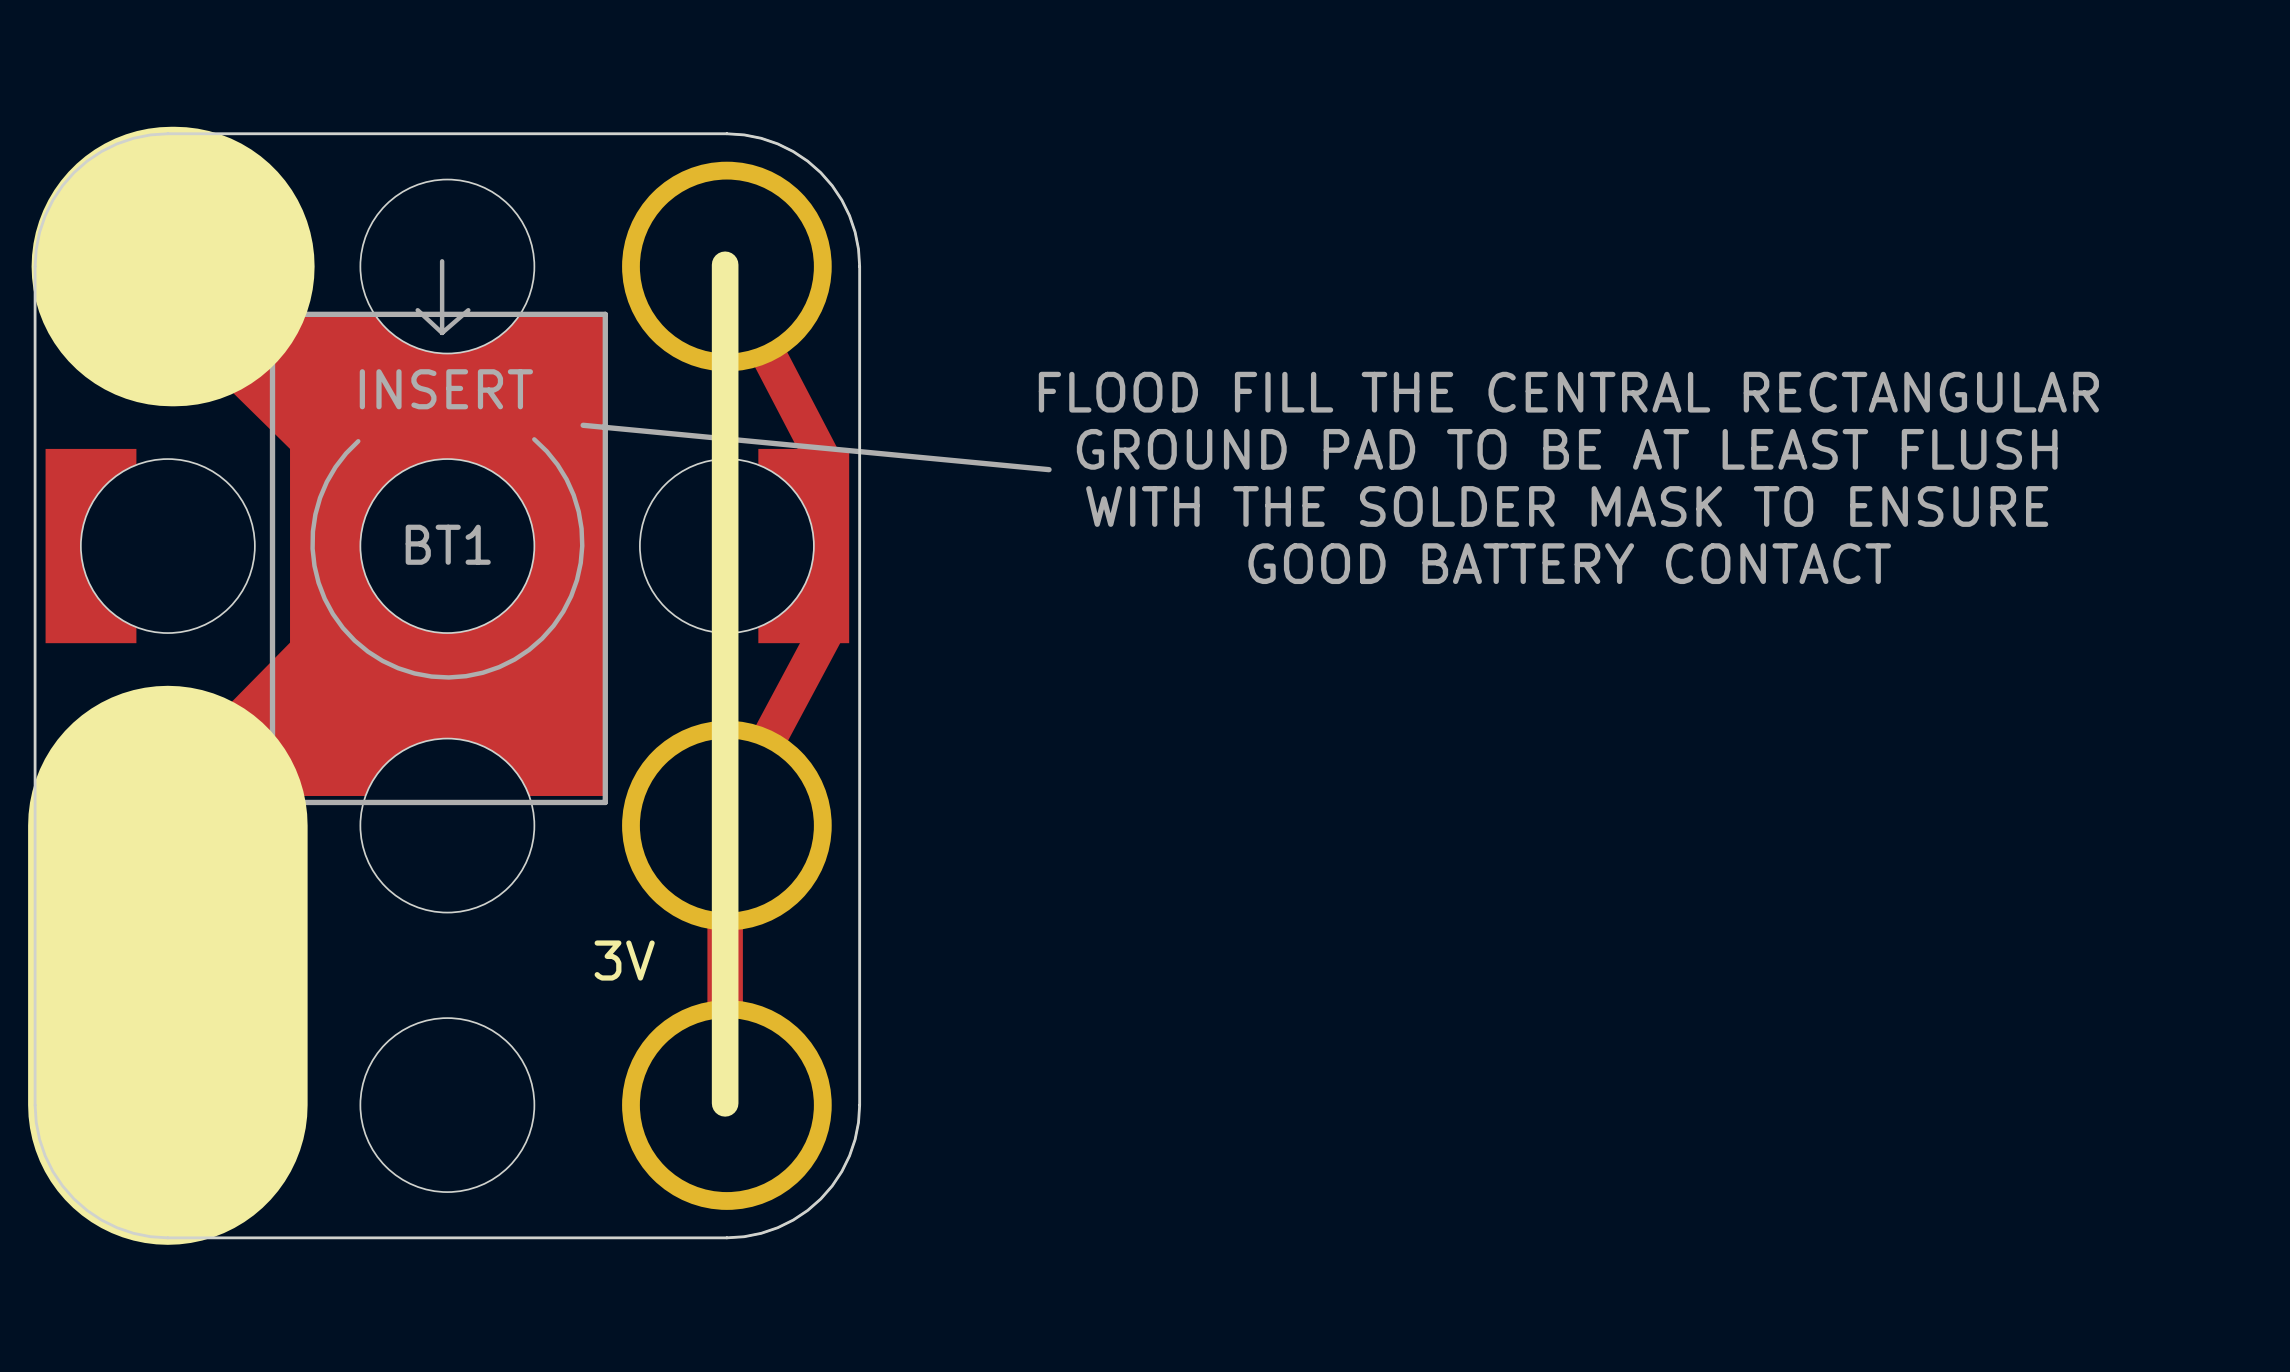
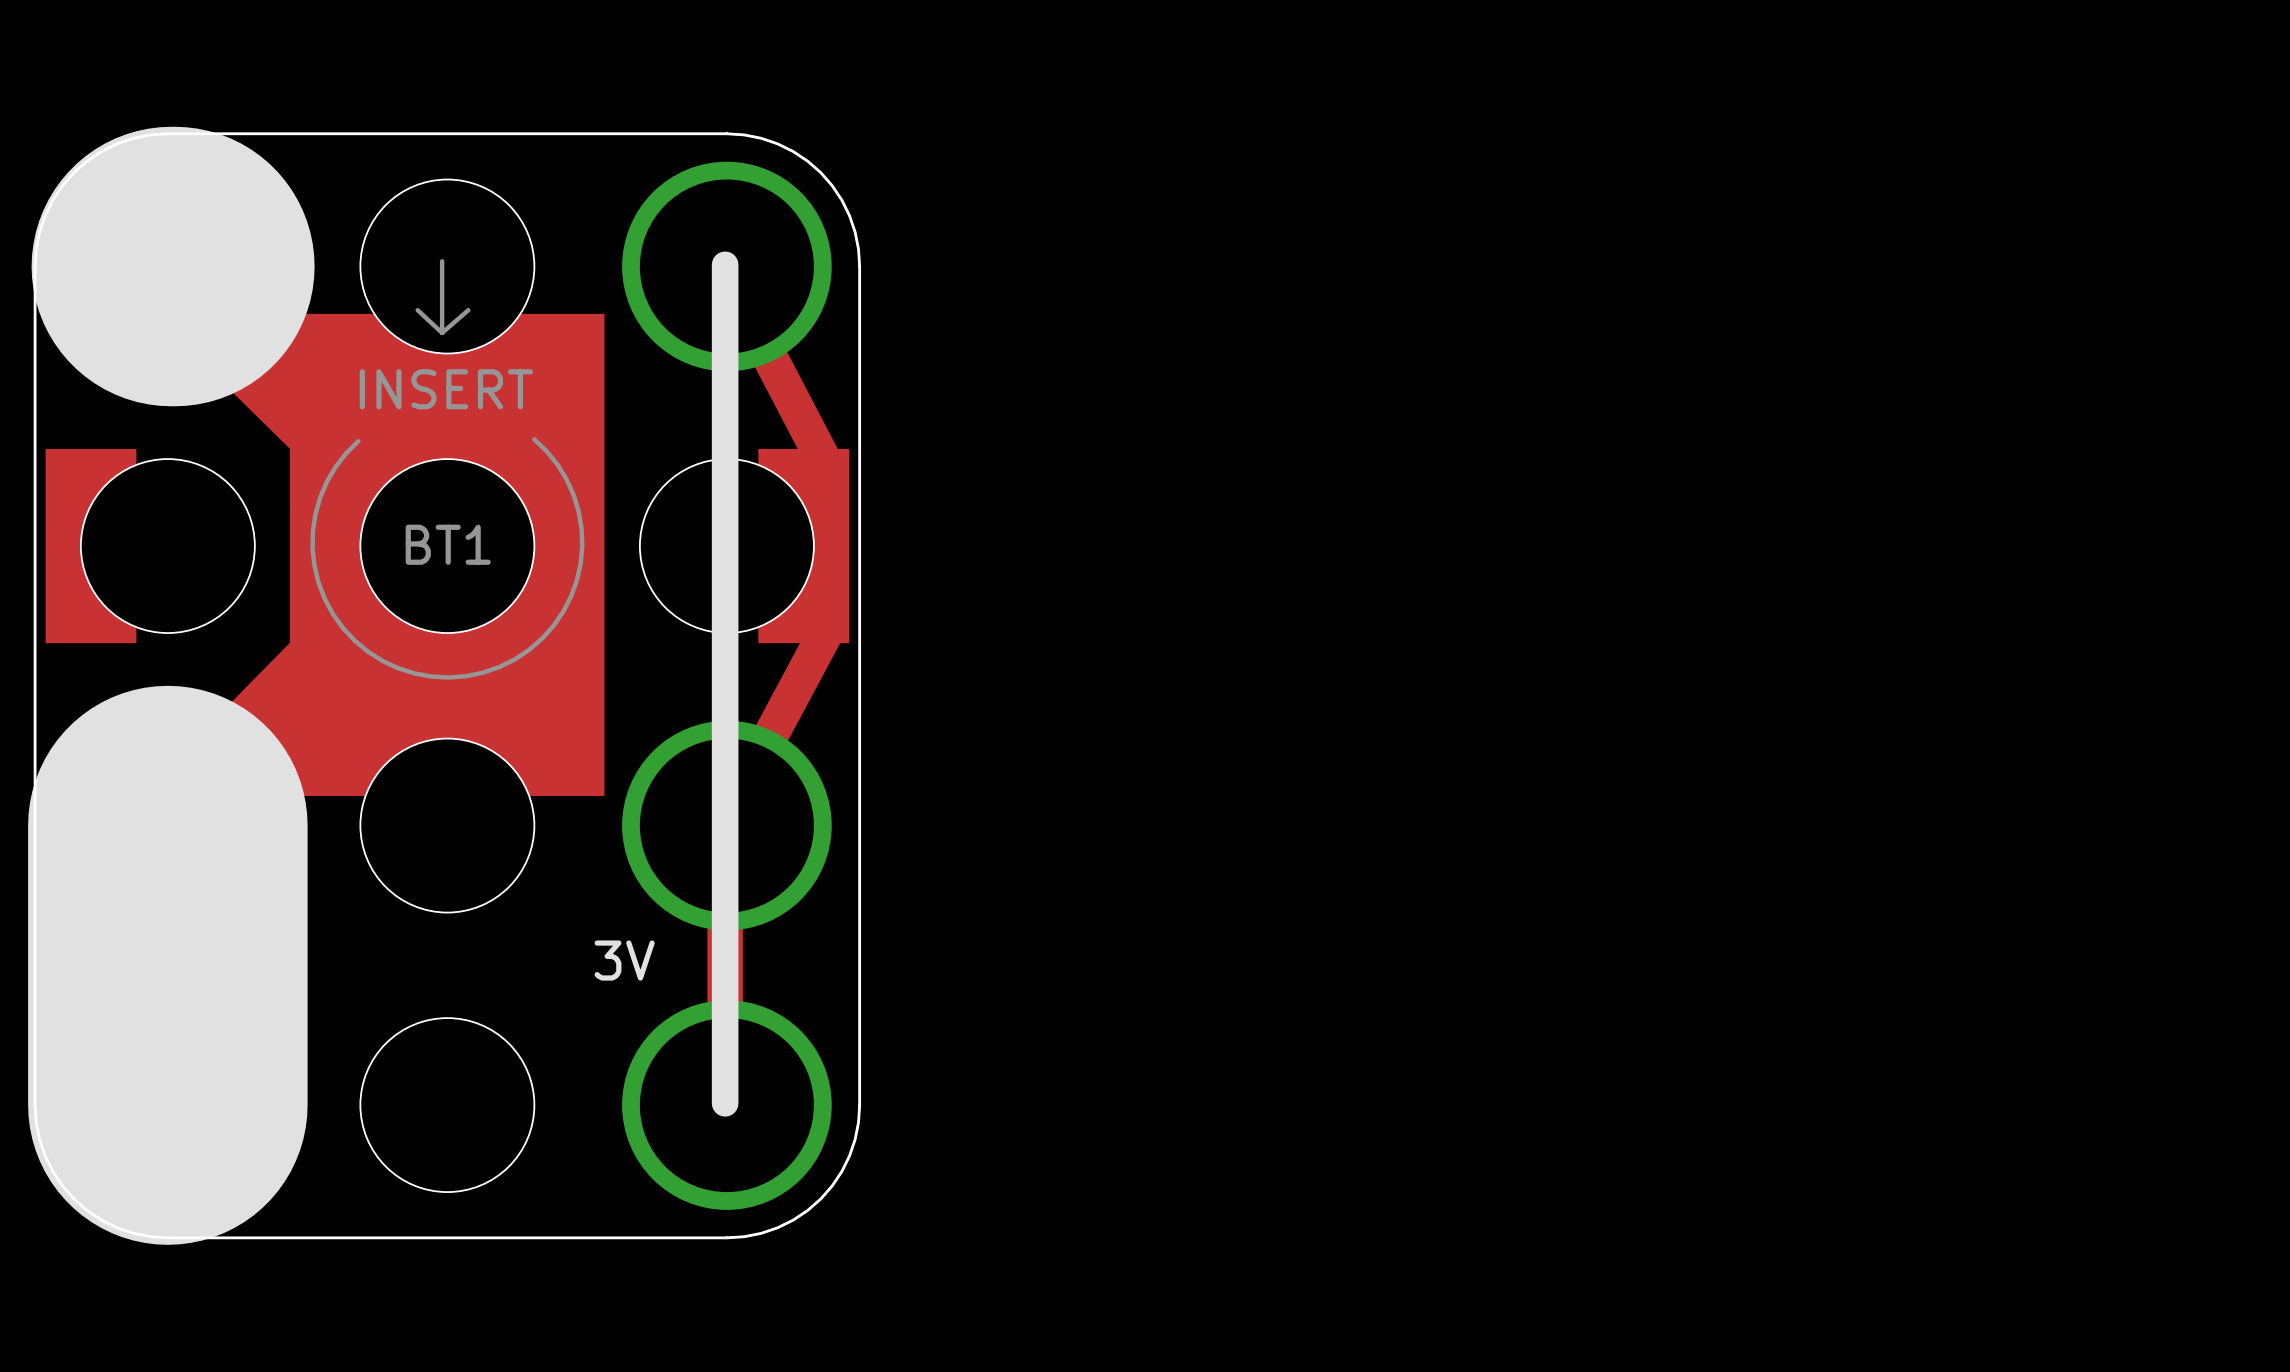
line: (272, 314) (272, 802) (605, 802) (605, 314) (272, 314) -> none
text: FLOOD FILL THE CENTRAL RECTANGULAR (1568, 392) -> none
line: (583, 425) (1049, 469) -> none
text: GROUND PAD TO BE AT LEAST FLUSH (1567, 449) -> none
text: WITH THE SOLDER MASK TO ENSURE (1567, 506) -> none
text: GOOD BATTERY CONTACT (1569, 563) -> none

